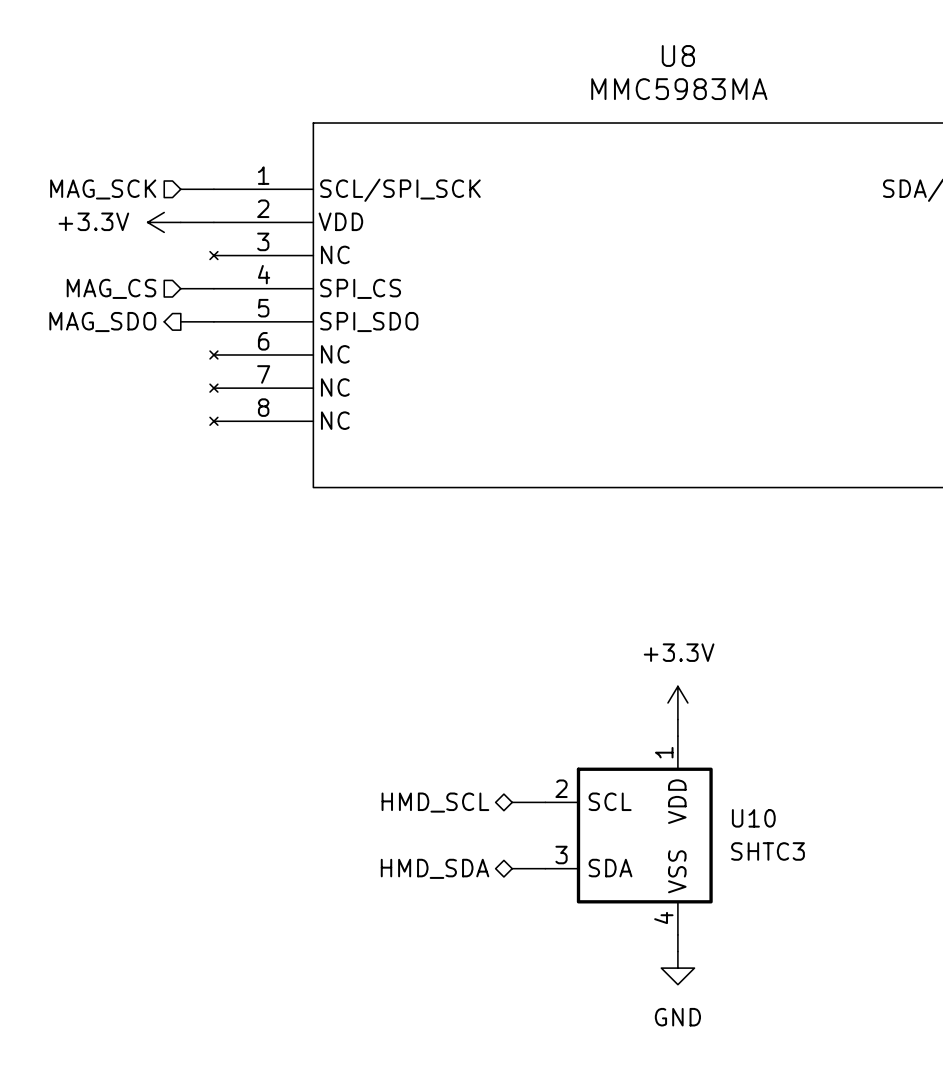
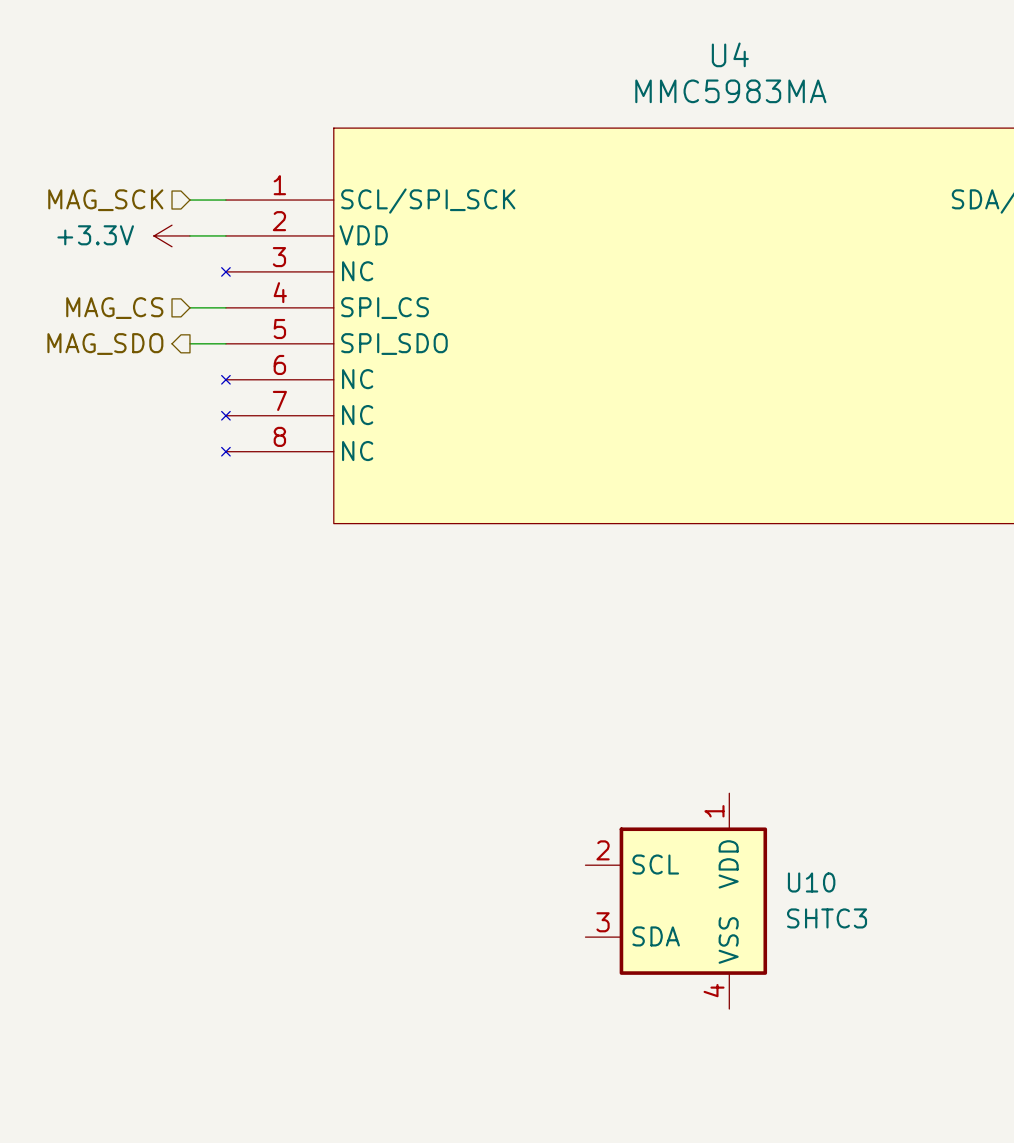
U8 name: U8 (678, 55) -> U4 (730, 54)
power symbol: +3.3V (677, 702) -> none
wire: (677, 719) (677, 736) -> none
hierarchical label: HMD_SCL (435, 802) -> none
wire: (512, 802) (545, 802) -> none
hierarchical label: HMD_SDA (435, 868) -> none
wire: (512, 868) (545, 868) -> none
wire: (677, 934) (677, 951) -> none
power symbol: GND (677, 968) -> none

